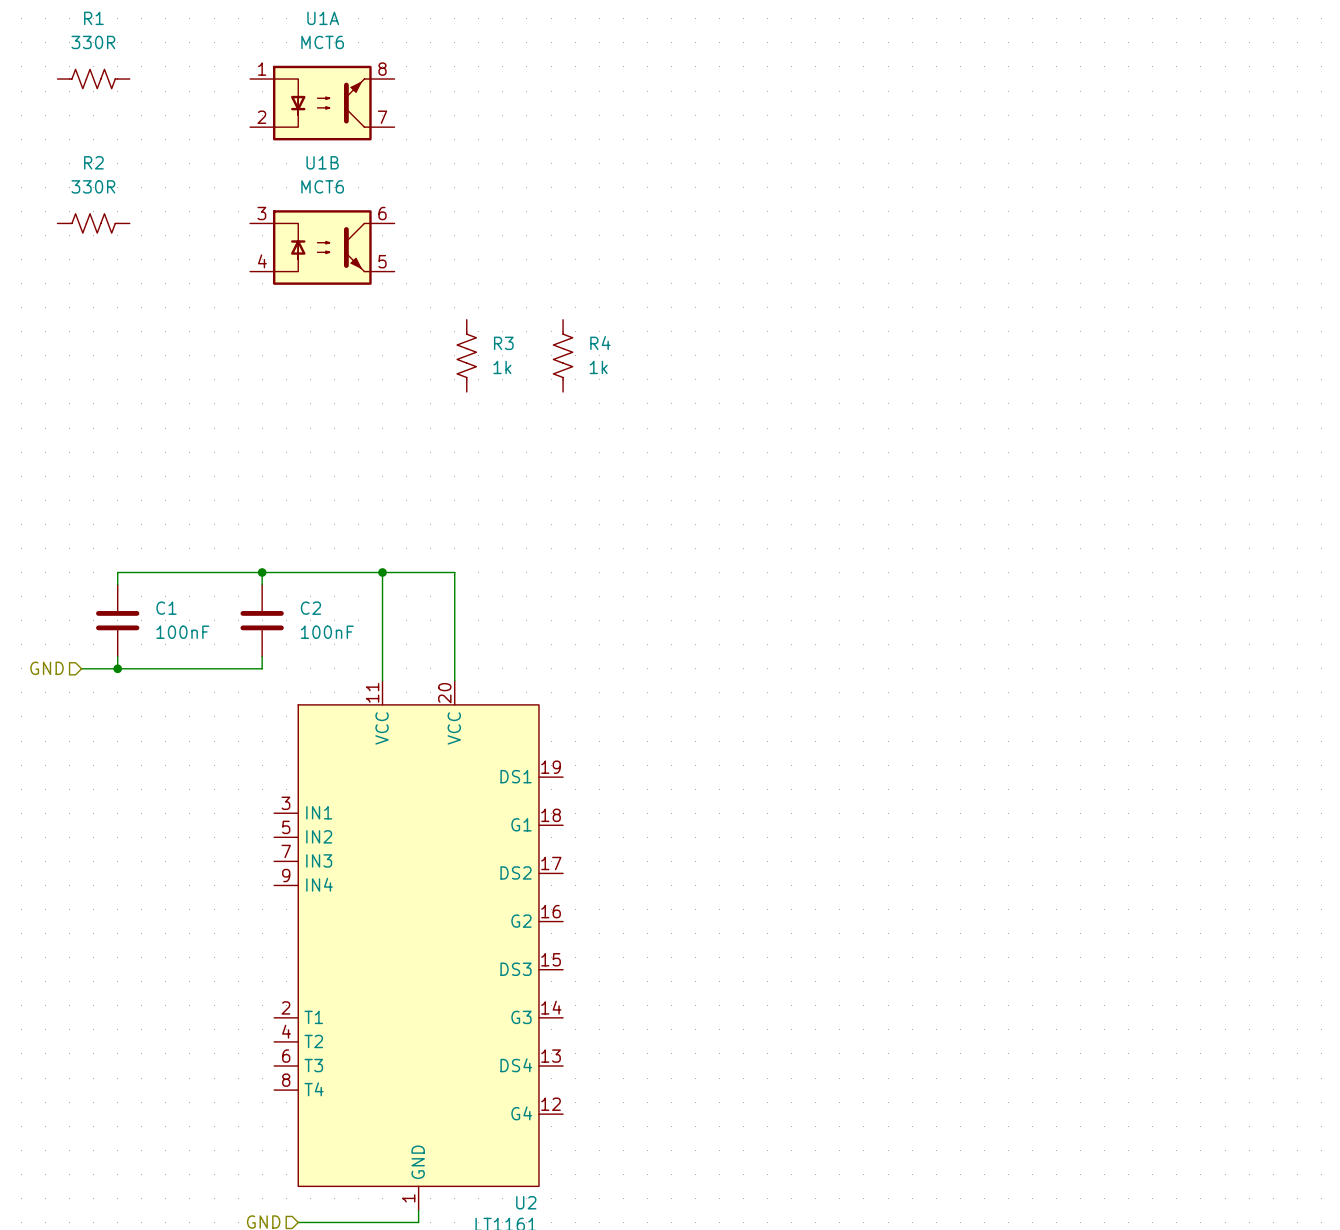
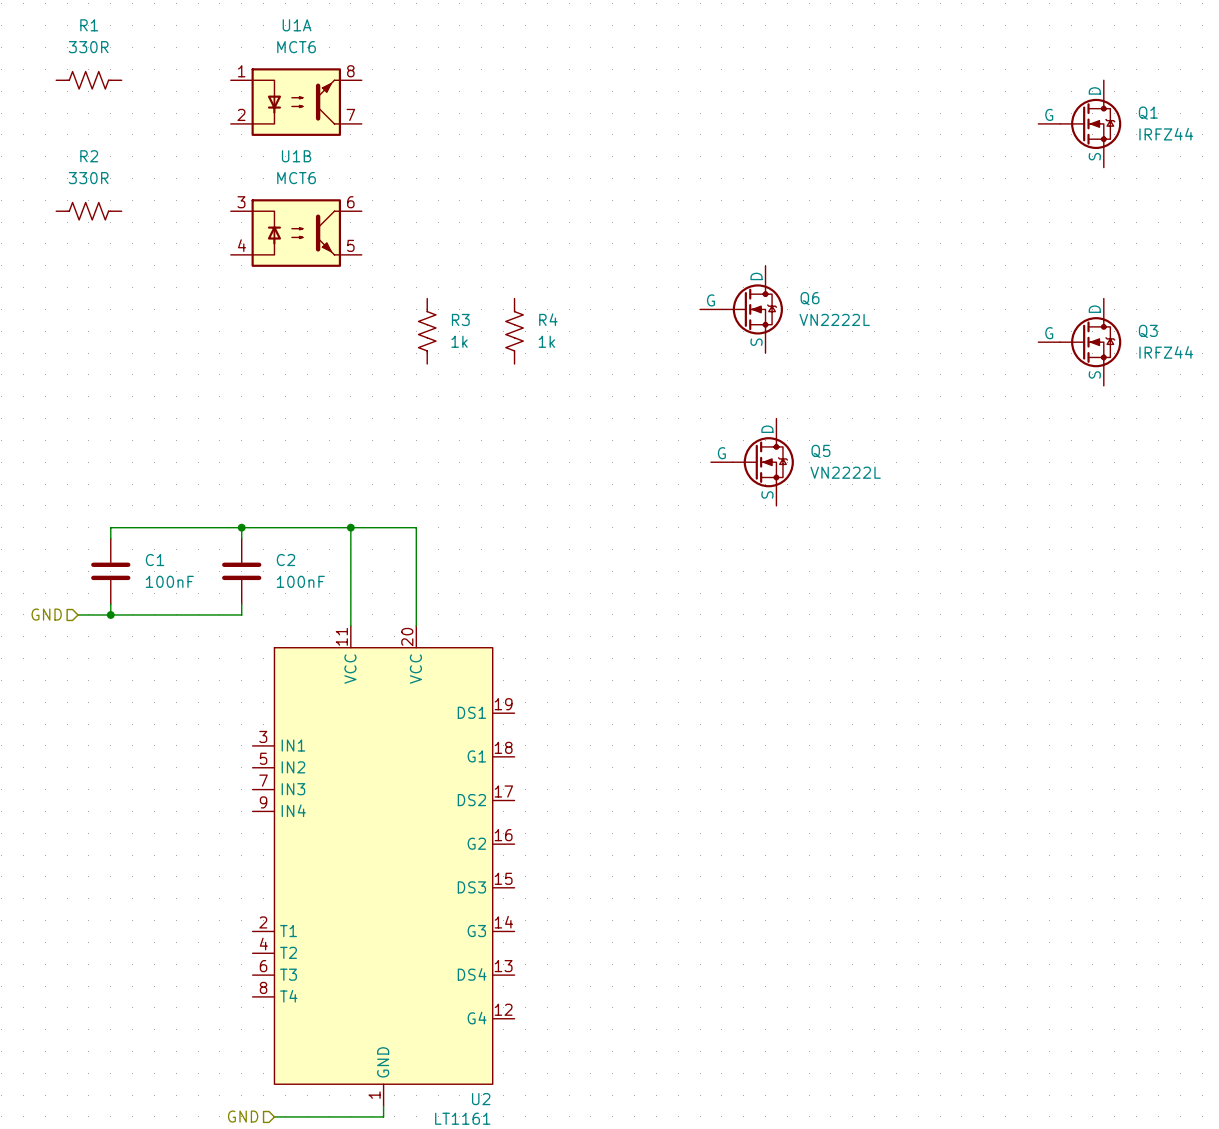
Q1: none -> IRFZ44 (1079, 123)
Q6: none -> VN2222L (741, 309)
Q3: none -> IRFZ44 (1079, 342)
Q5: none -> VN2222L (752, 462)

